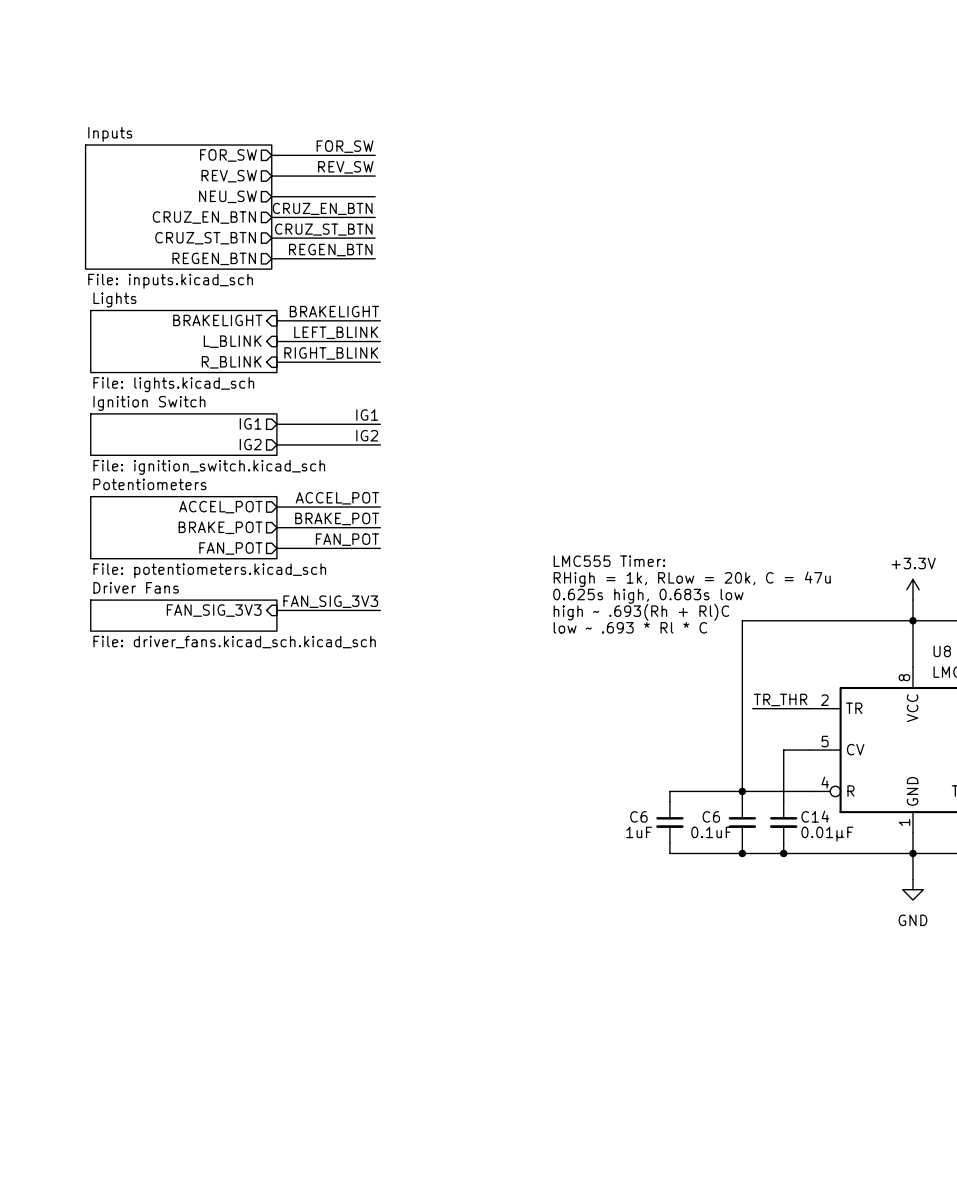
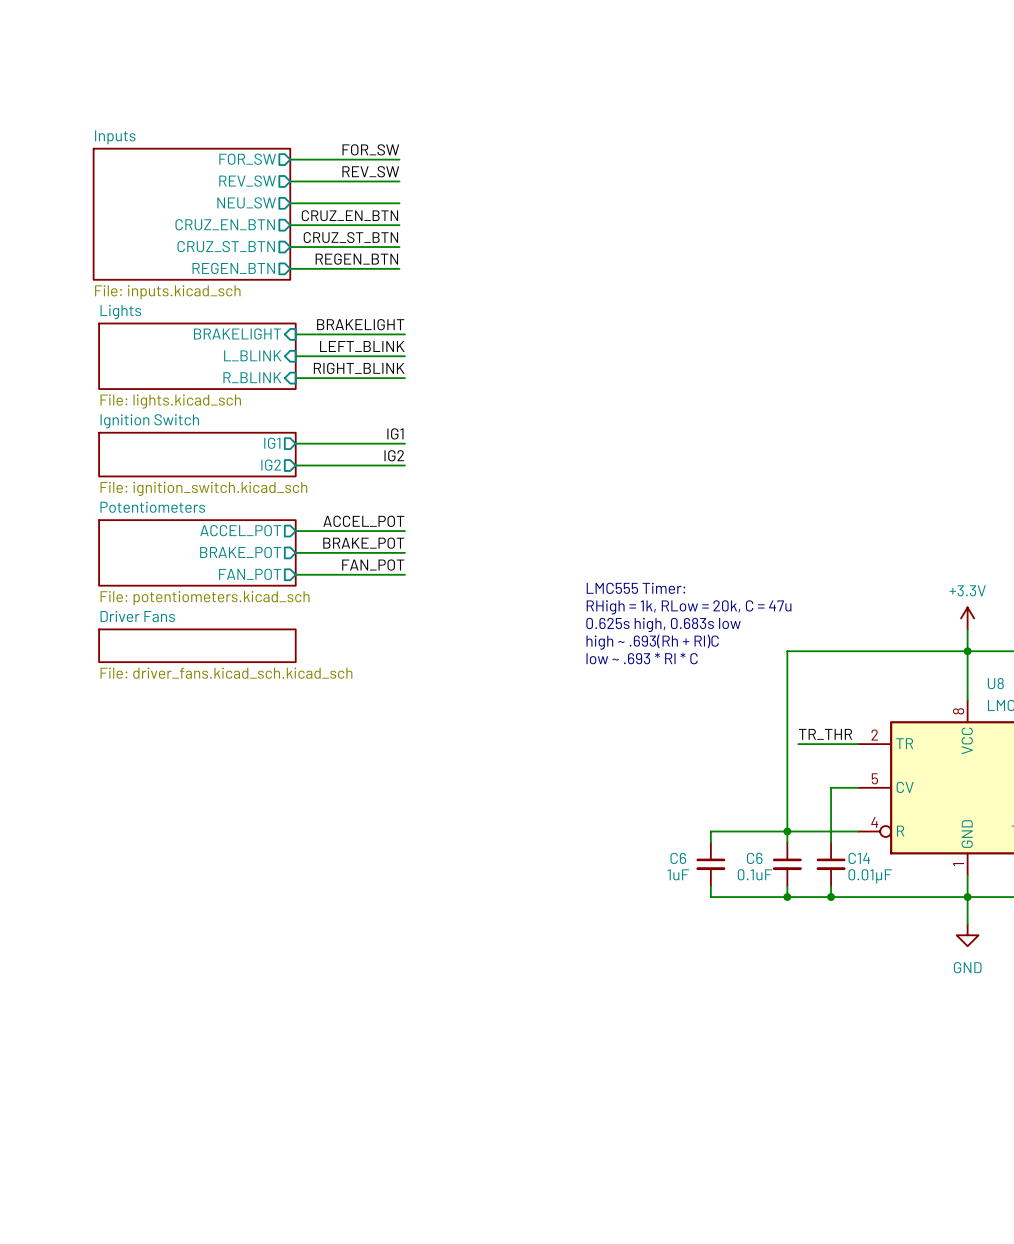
label: FAN_SIG_3V3 (330, 601) -> none
sheet pin: FAN_SIG_3V3 (214, 610) -> none
wire: (276, 610) (380, 610) -> none

